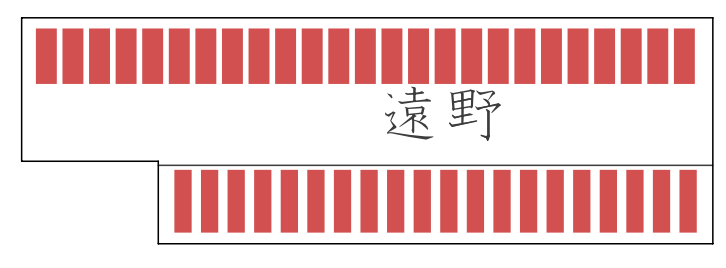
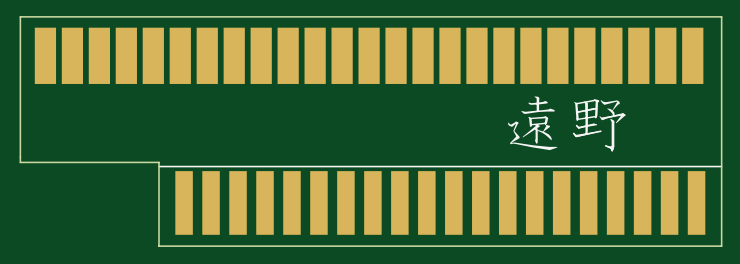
drawing: [385, 86, 501, 141] -> none
drawing: none -> [508, 96, 626, 151]

